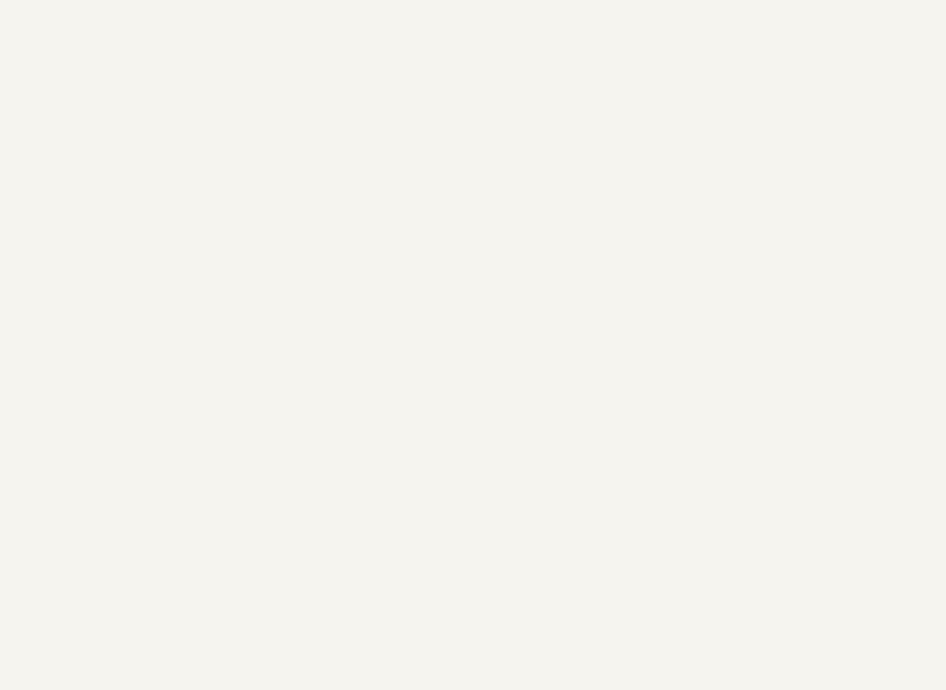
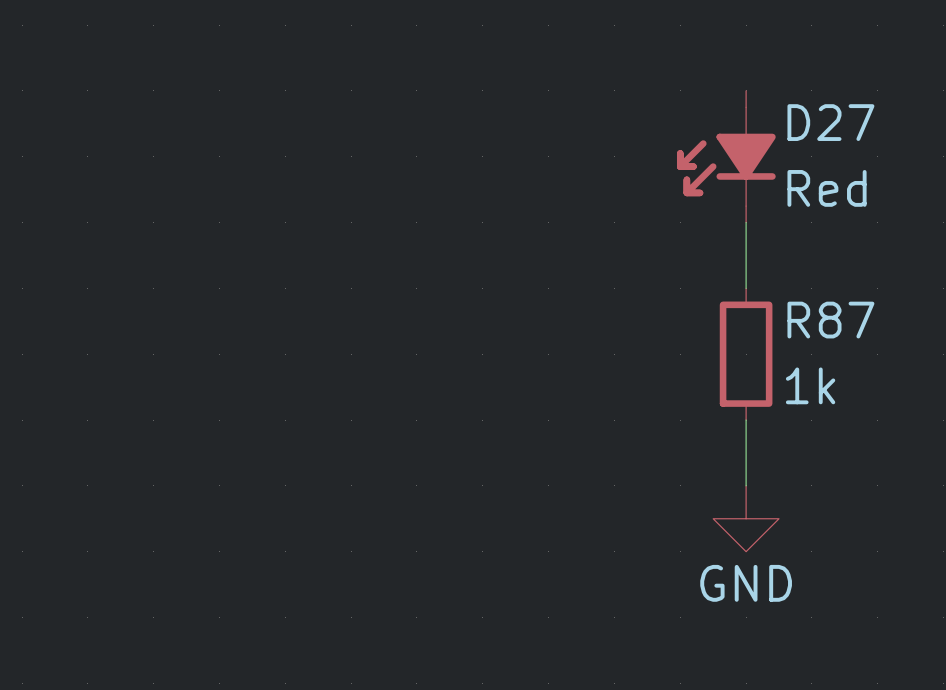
D27: none -> (726, 156)
wire: none -> (746, 222) (746, 288)
R87: none -> (746, 354)
wire: none -> (746, 420) (746, 485)
power symbol: none -> GND (746, 518)

